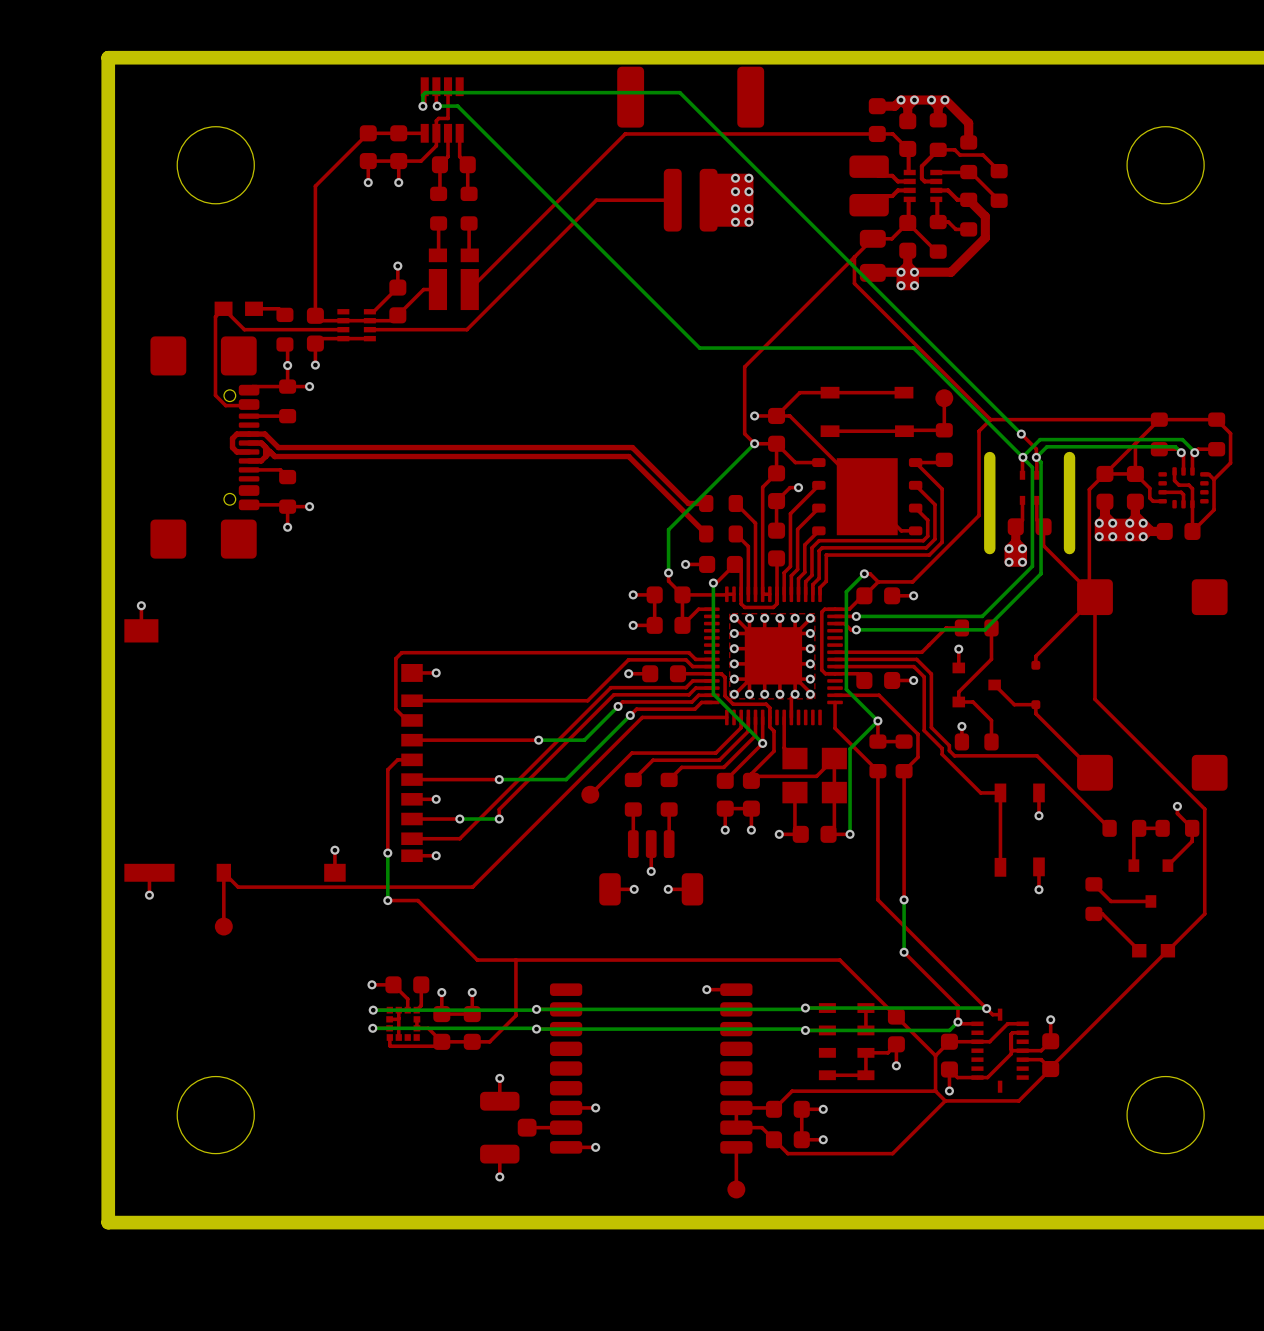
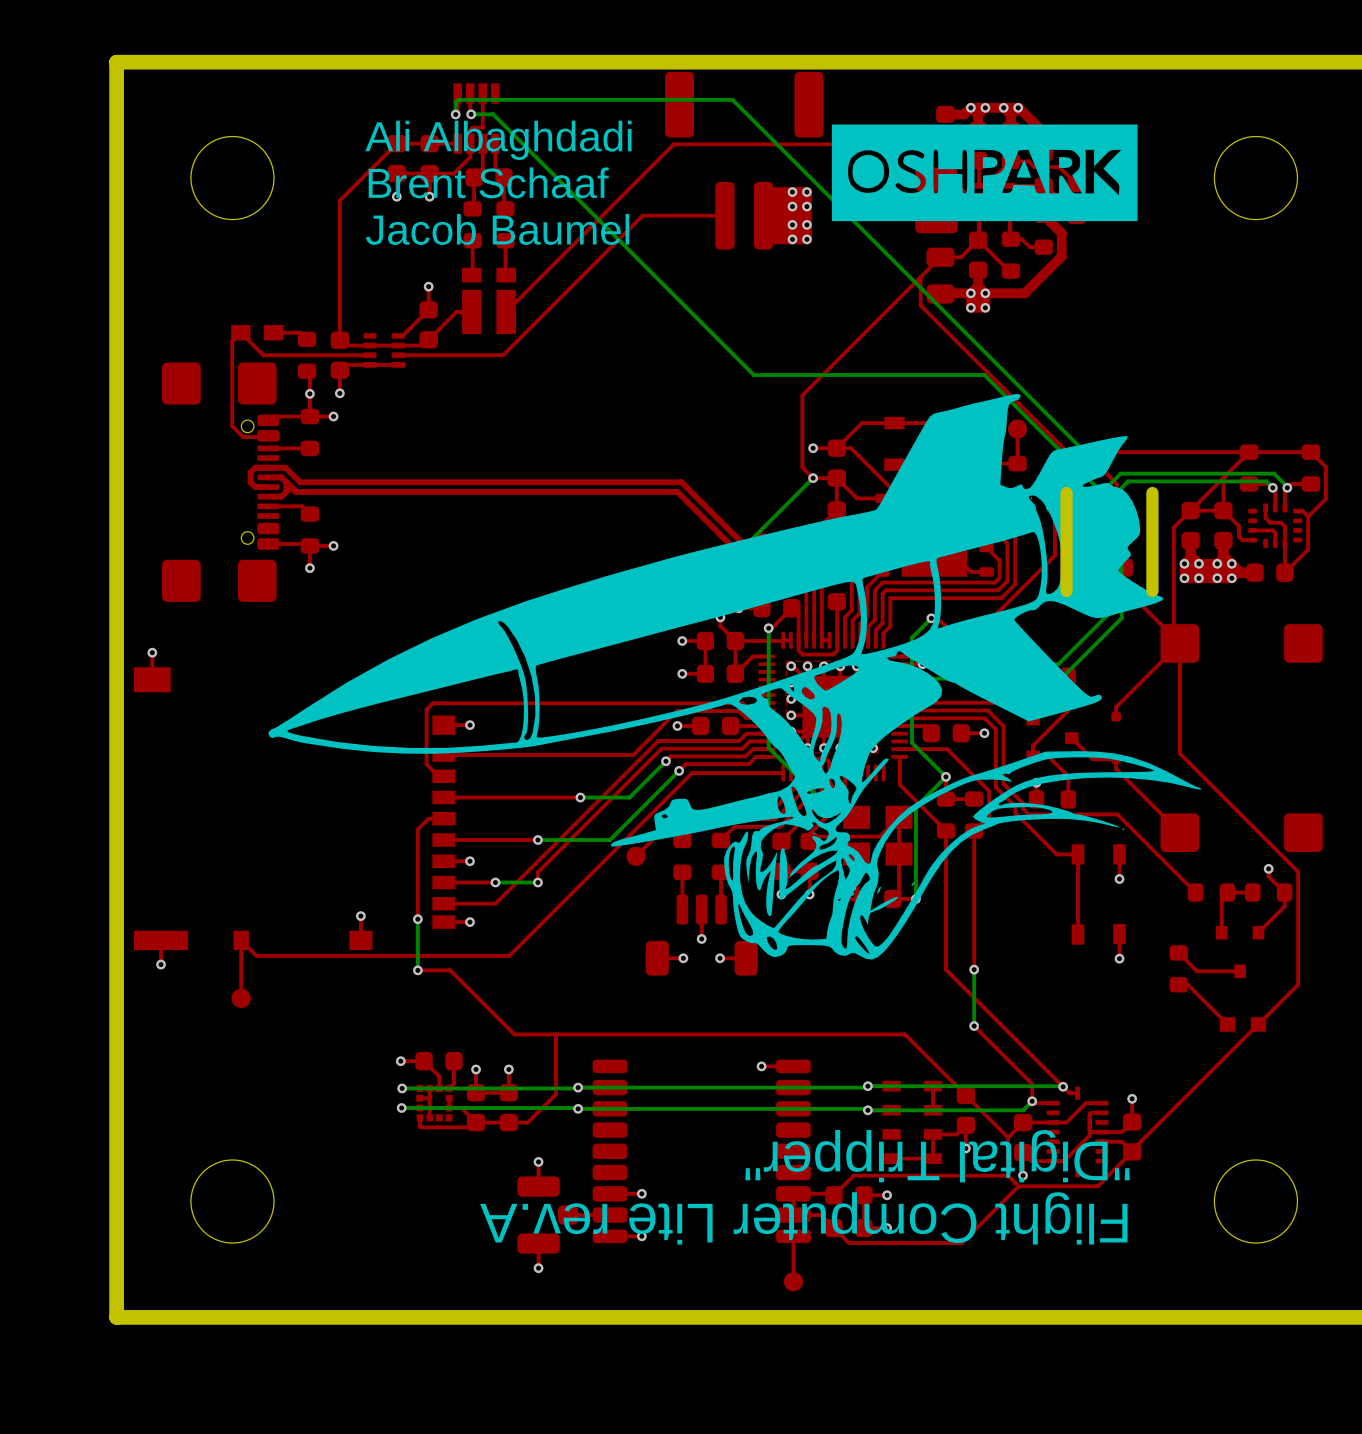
drawing: none -> [831, 124, 1138, 222]
text: none -> Ali Albaghdadi (498, 140)
text: none -> Brent Schaaf (488, 182)
text: none -> Jacob Baumel (497, 229)
drawing: none -> [268, 393, 1202, 960]
text: none -> "Digital Tripper" (937, 1156)
text: none -> Flight Computer Lite rev.A (803, 1218)

